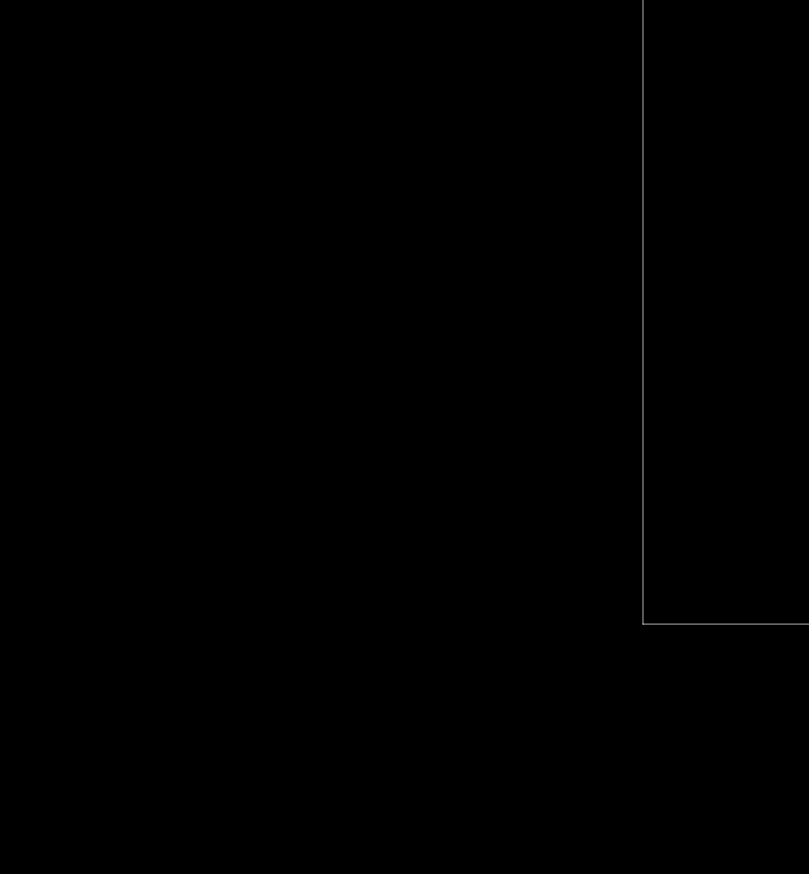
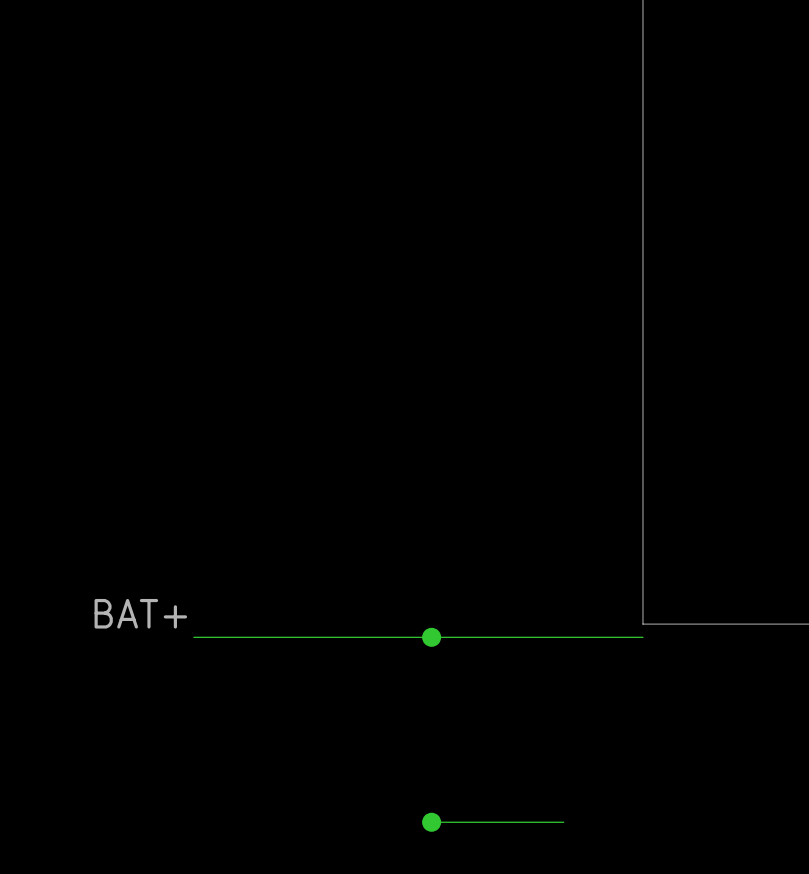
label: none -> BAT+ (140, 613)
wire: none -> (193, 637) (642, 637)
junction: none -> (431, 637)
wire: none -> (431, 822) (563, 822)
junction: none -> (431, 822)

